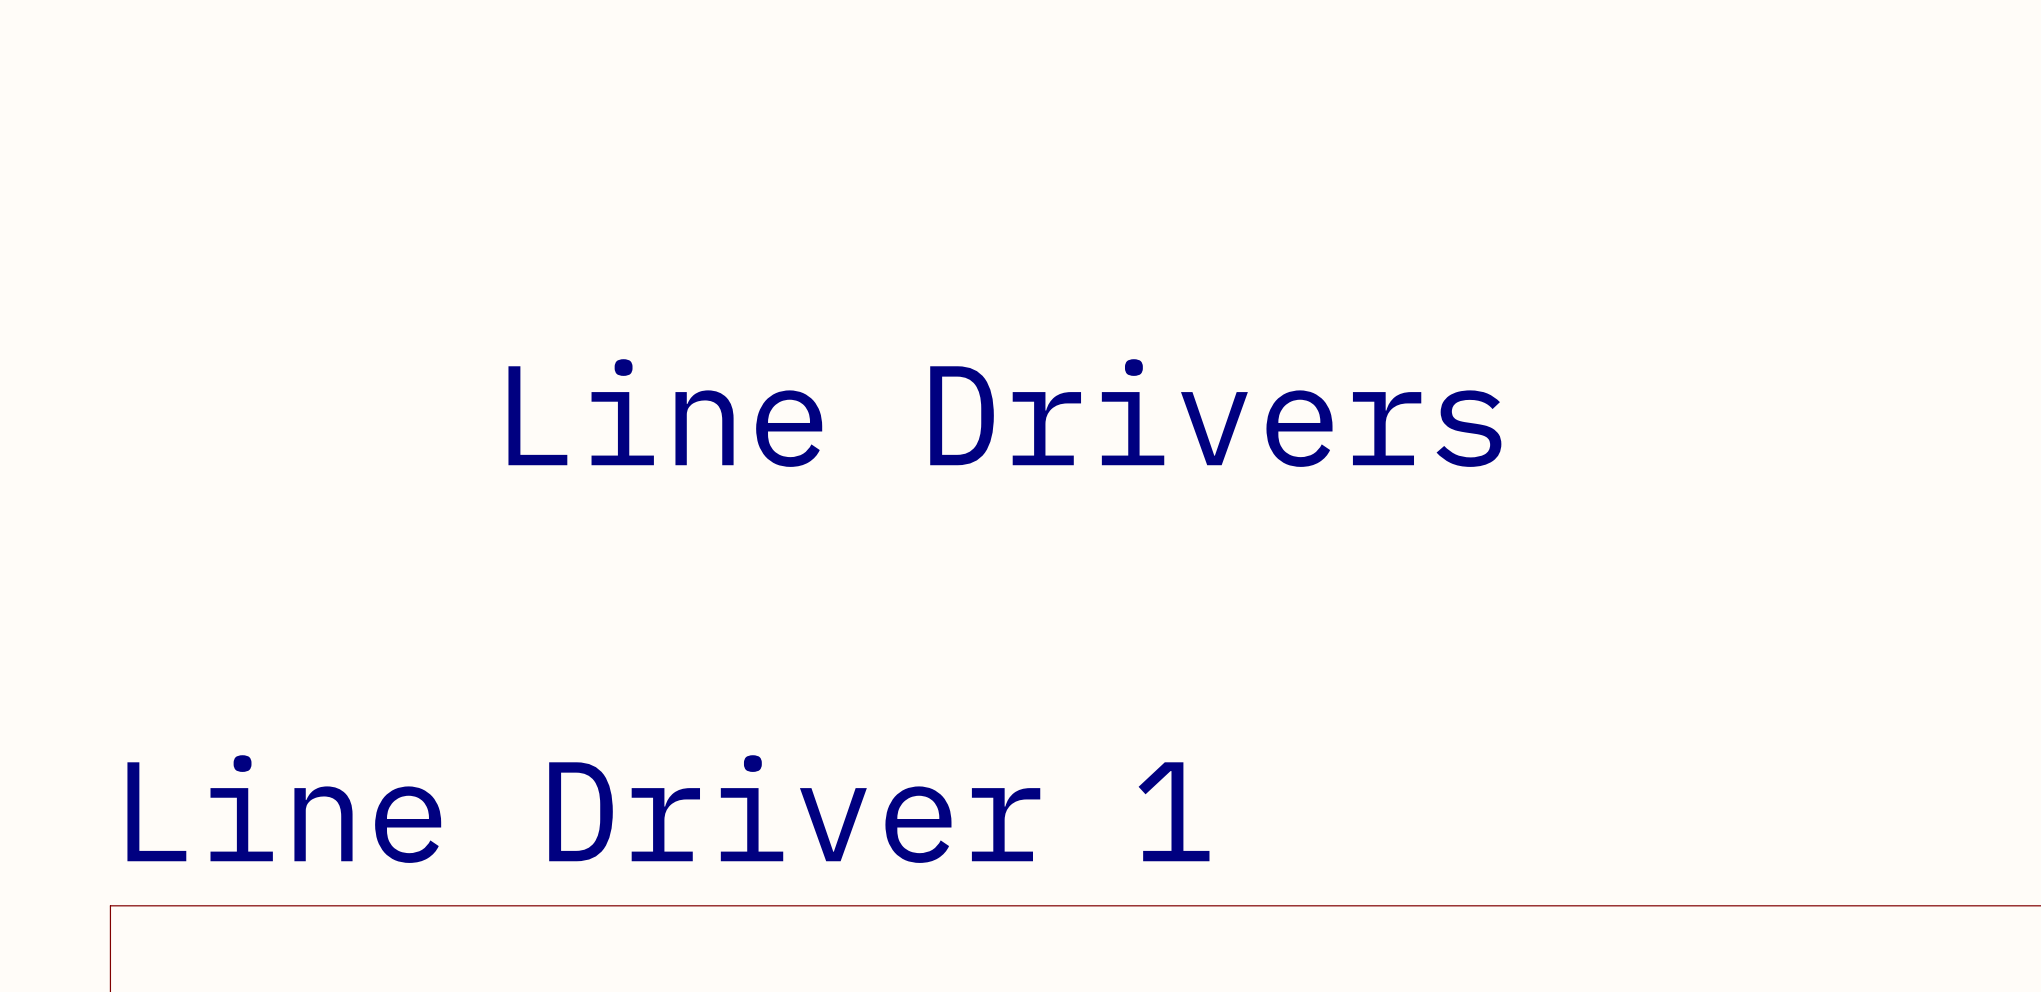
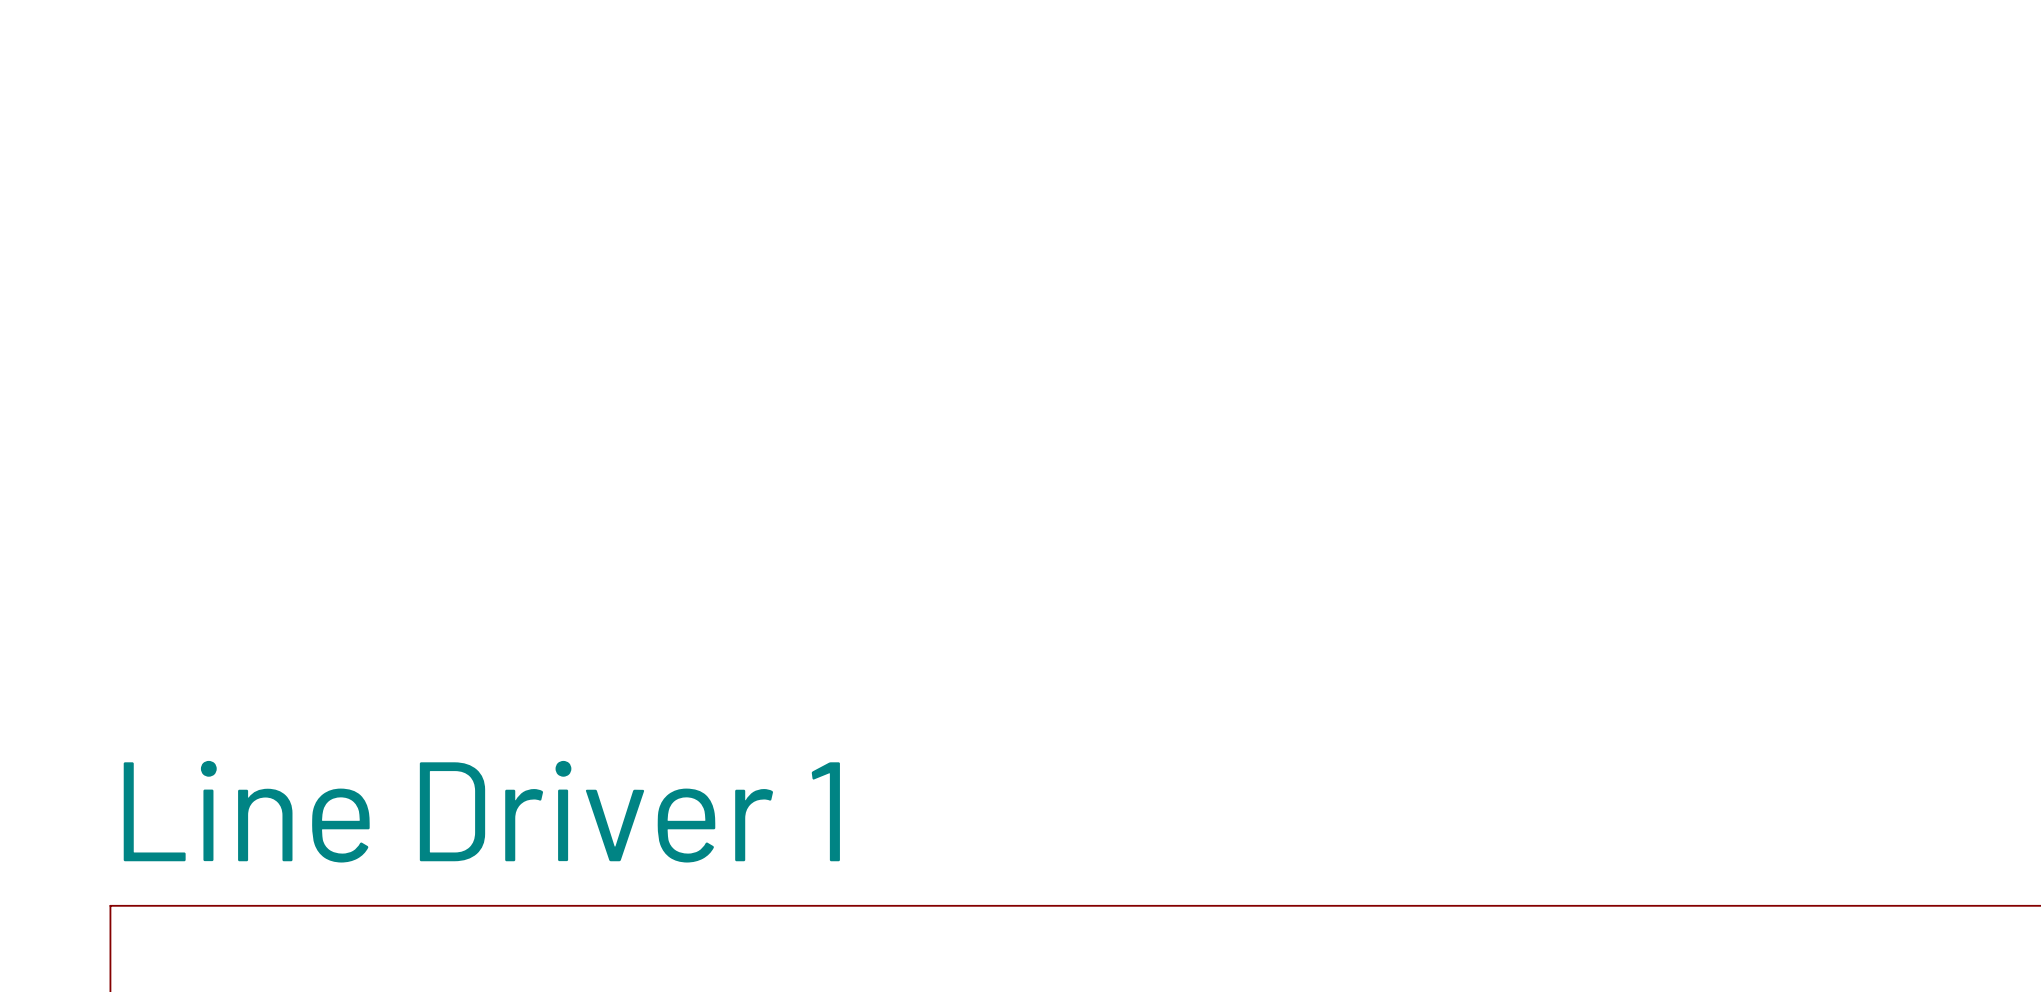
text: Line Drivers (1004, 413) -> none

